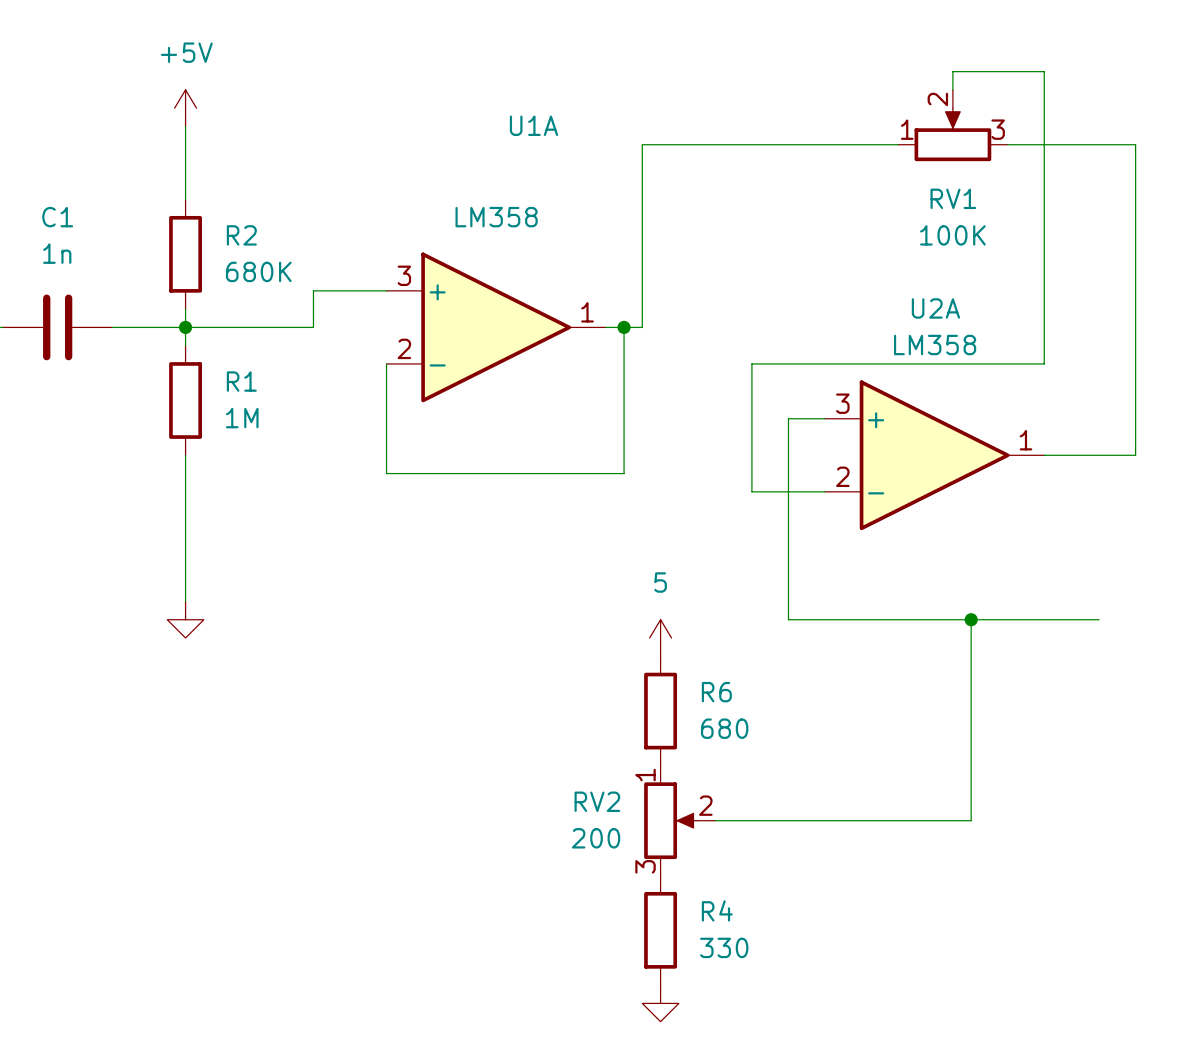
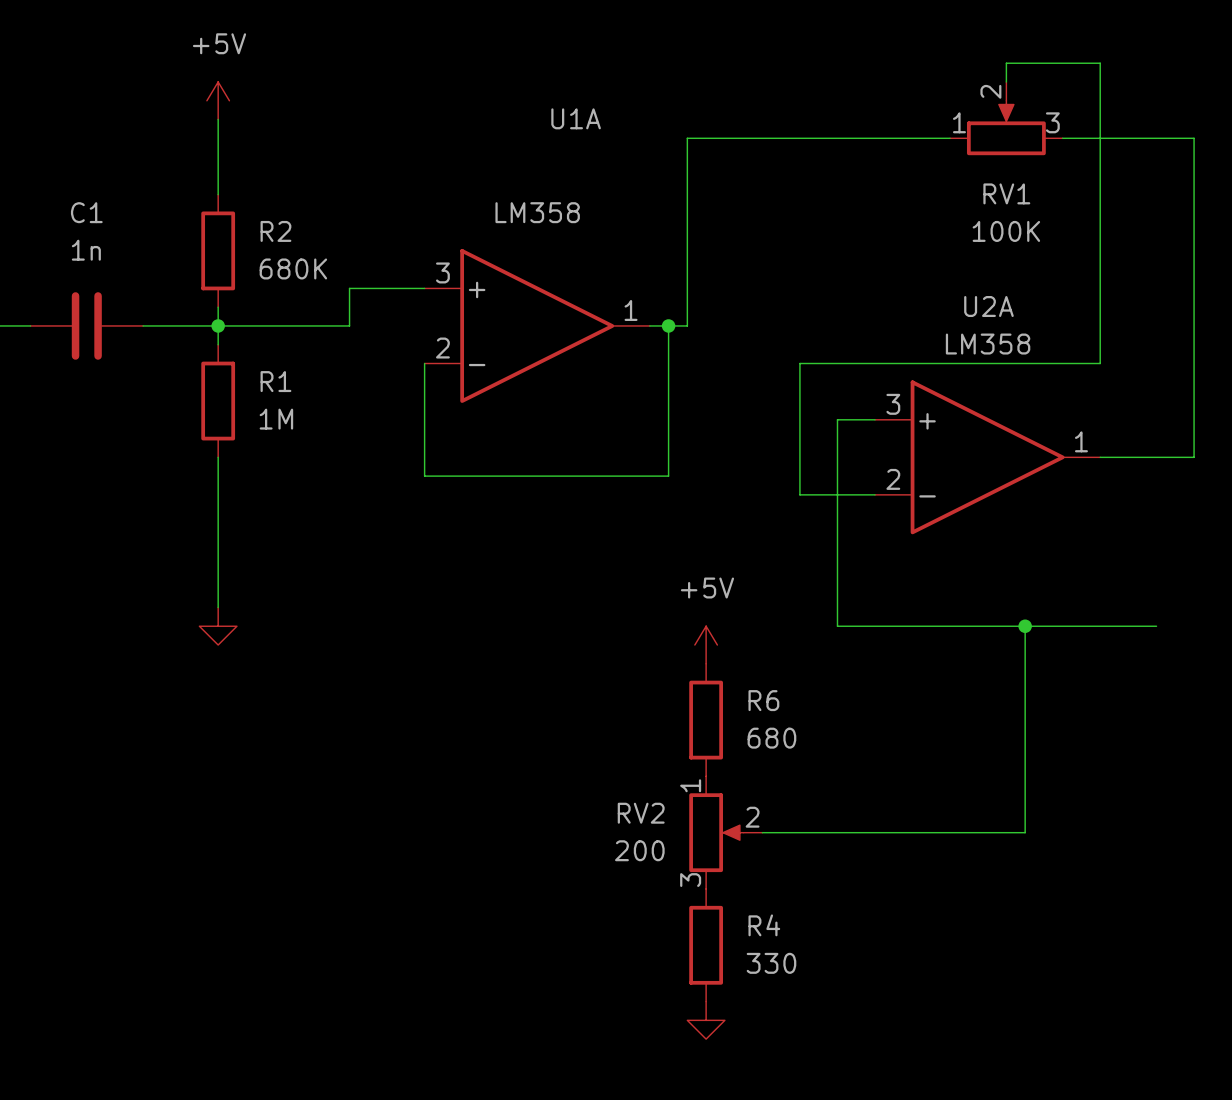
power symbol: 5 (660, 638) -> +5V (706, 645)

